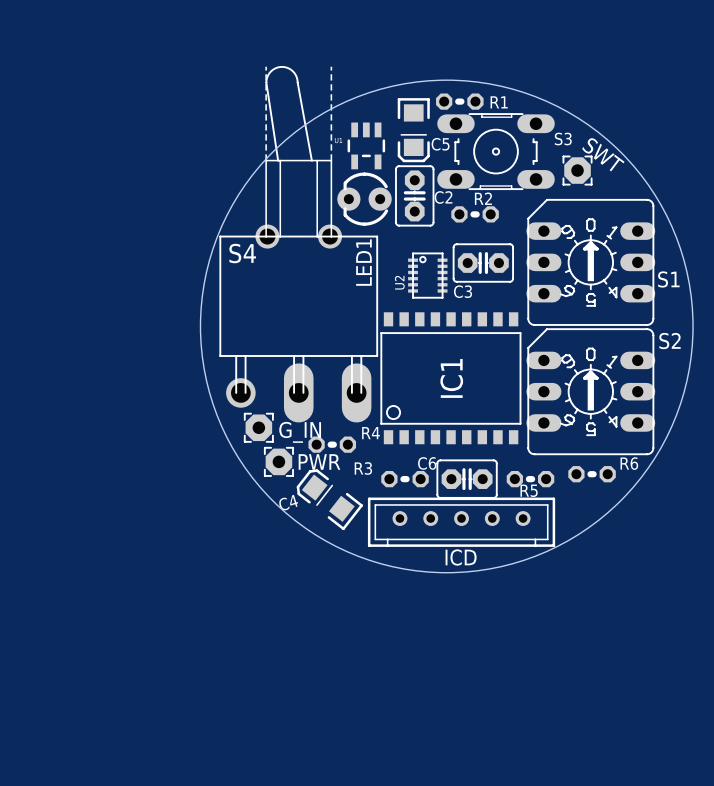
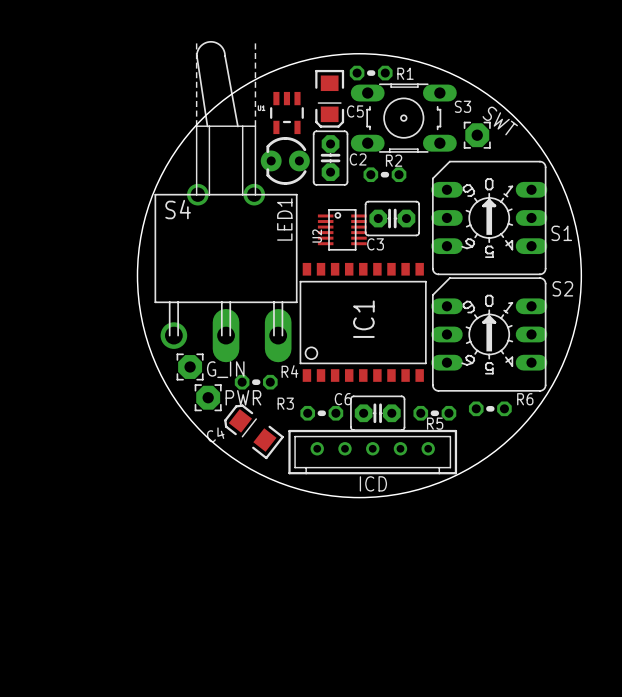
U2 footprint: [408, 252, 448, 299] -> [317, 209, 367, 251]

